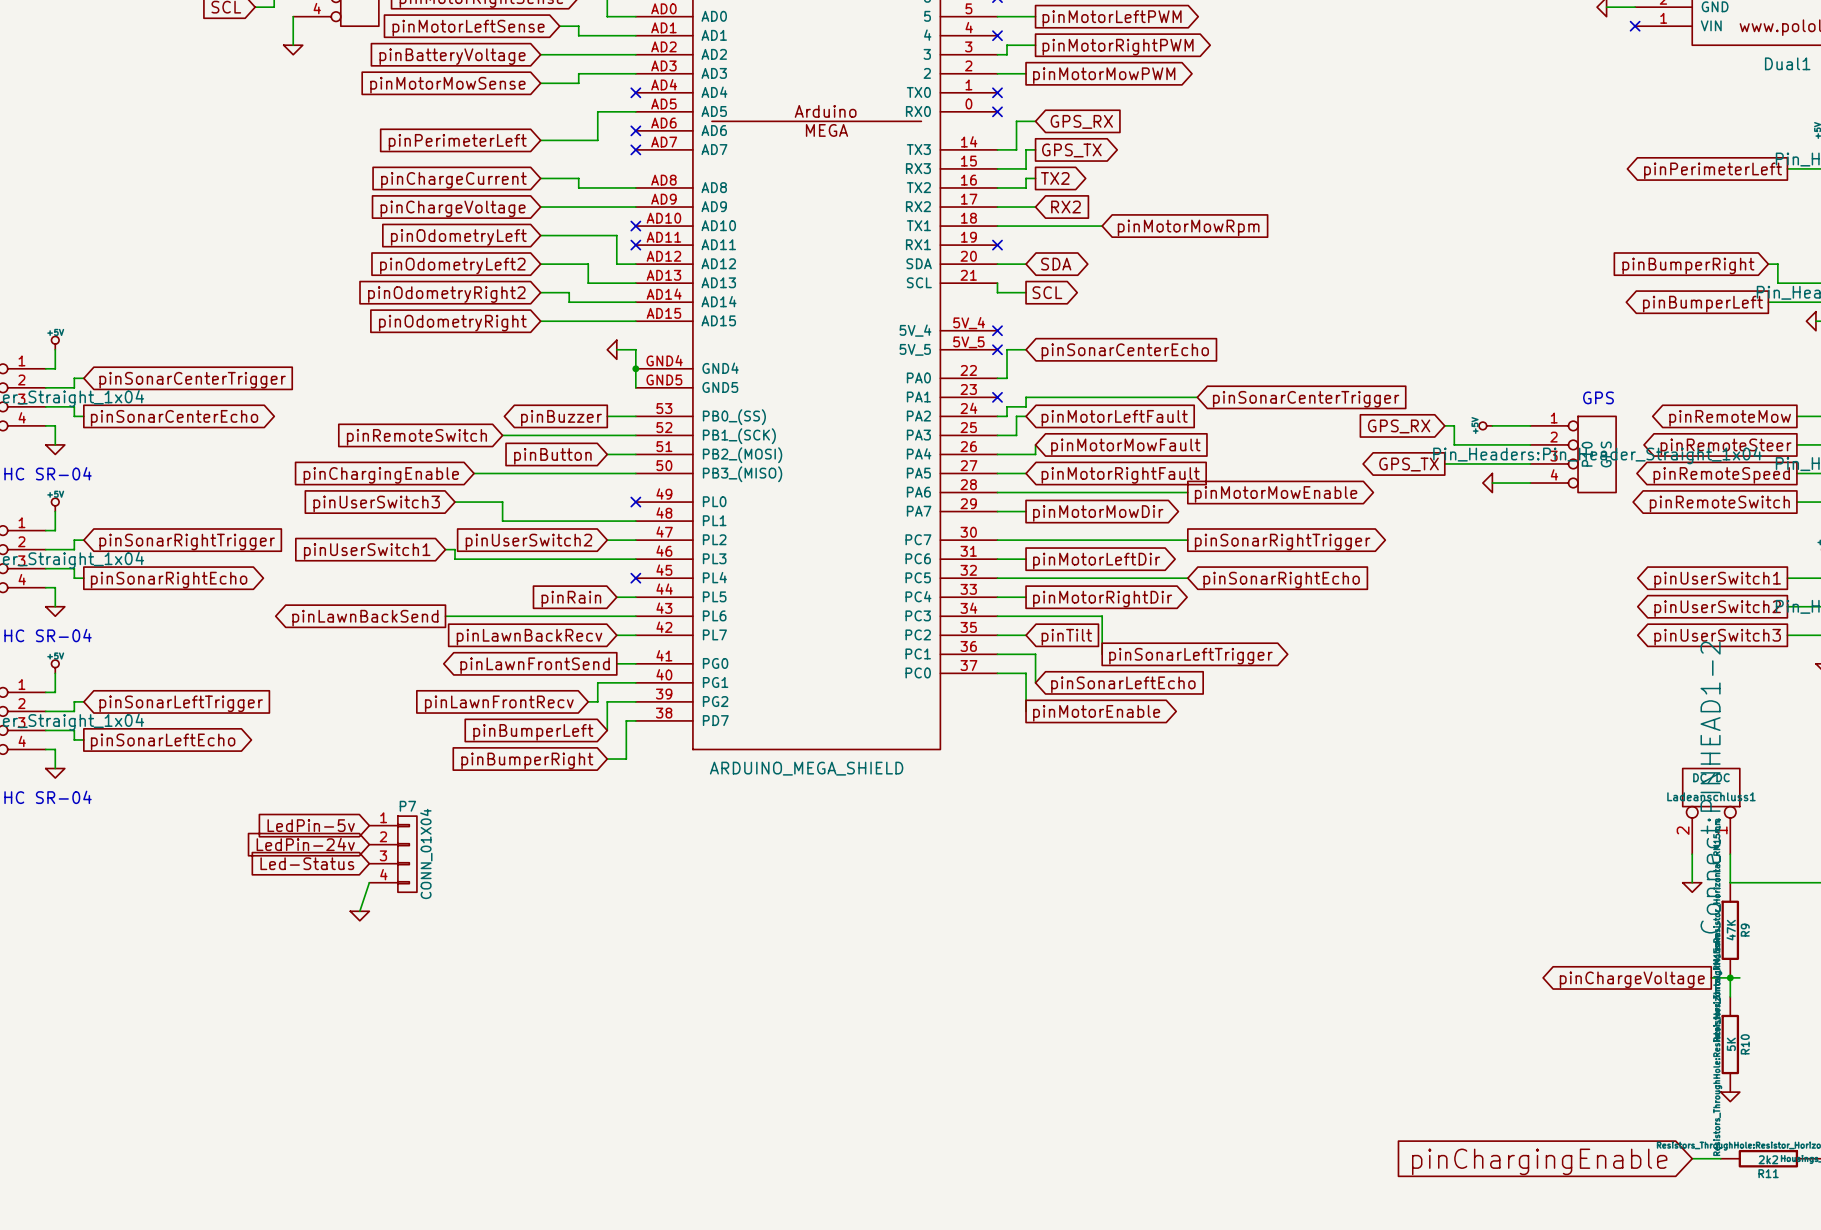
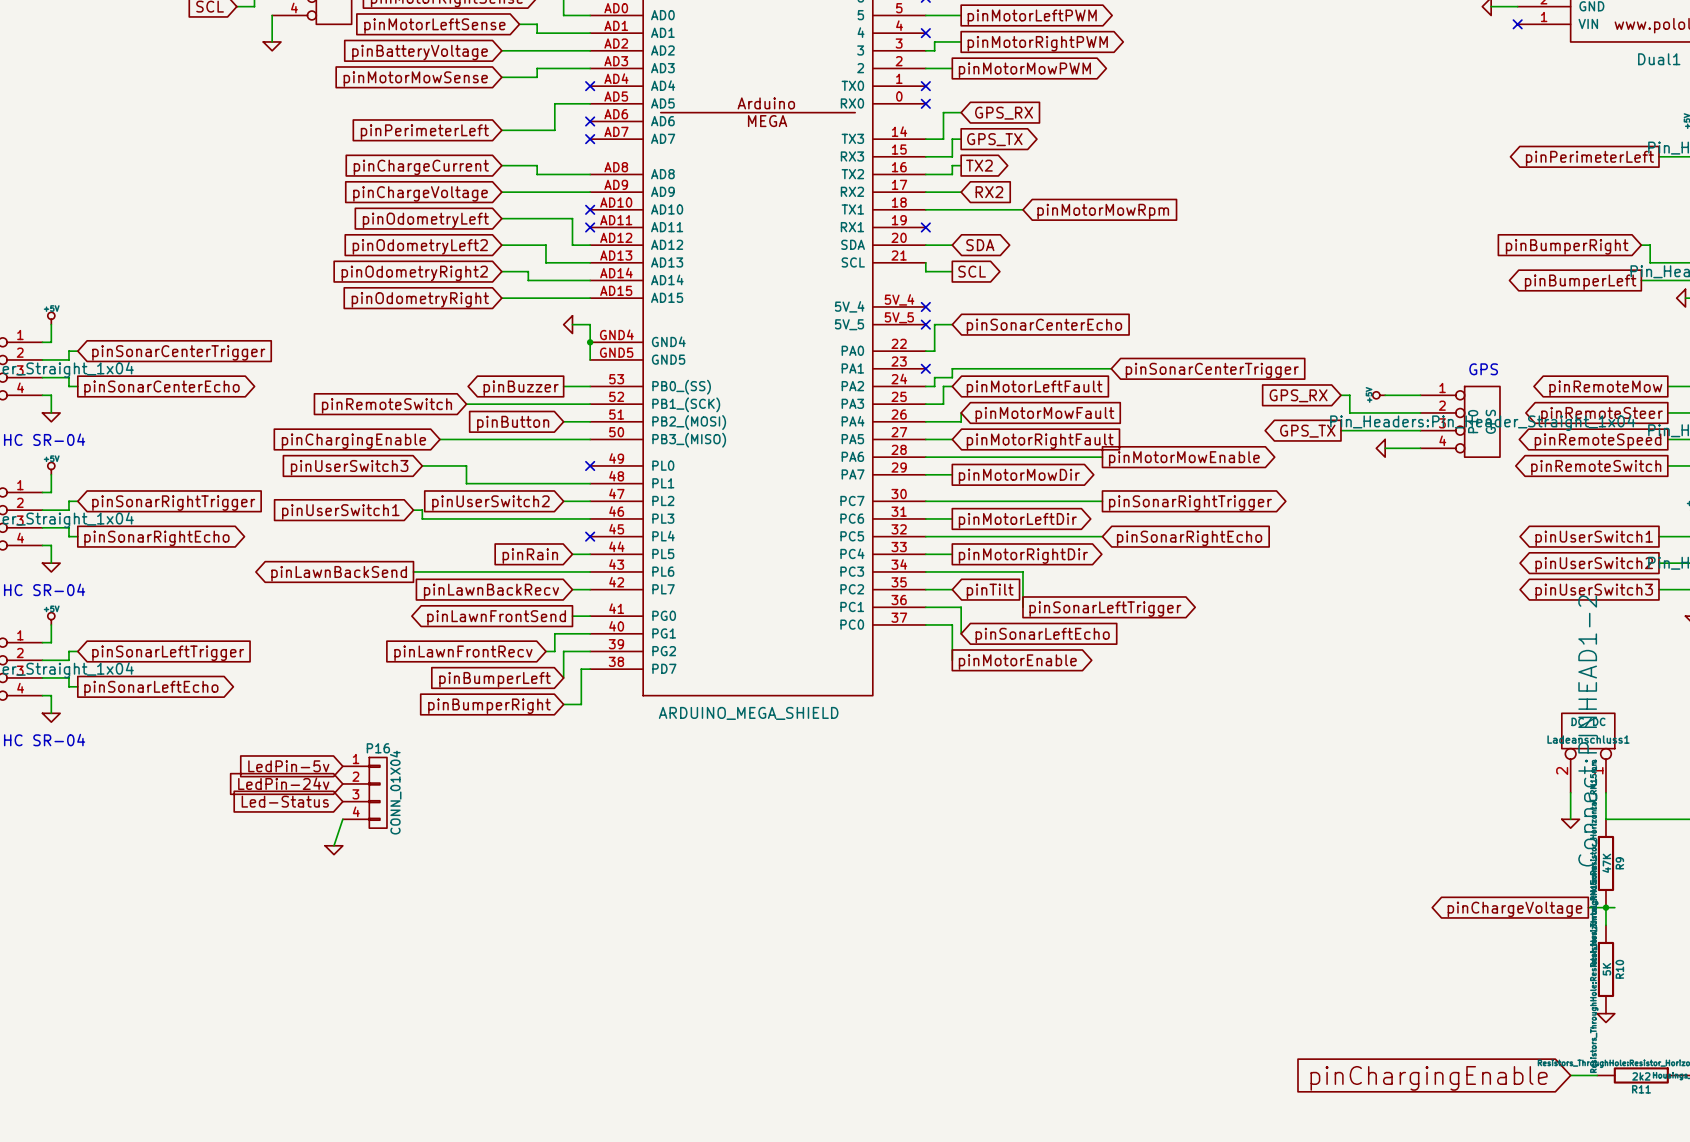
P7 name: P7 (407, 806) -> P16 (378, 748)

